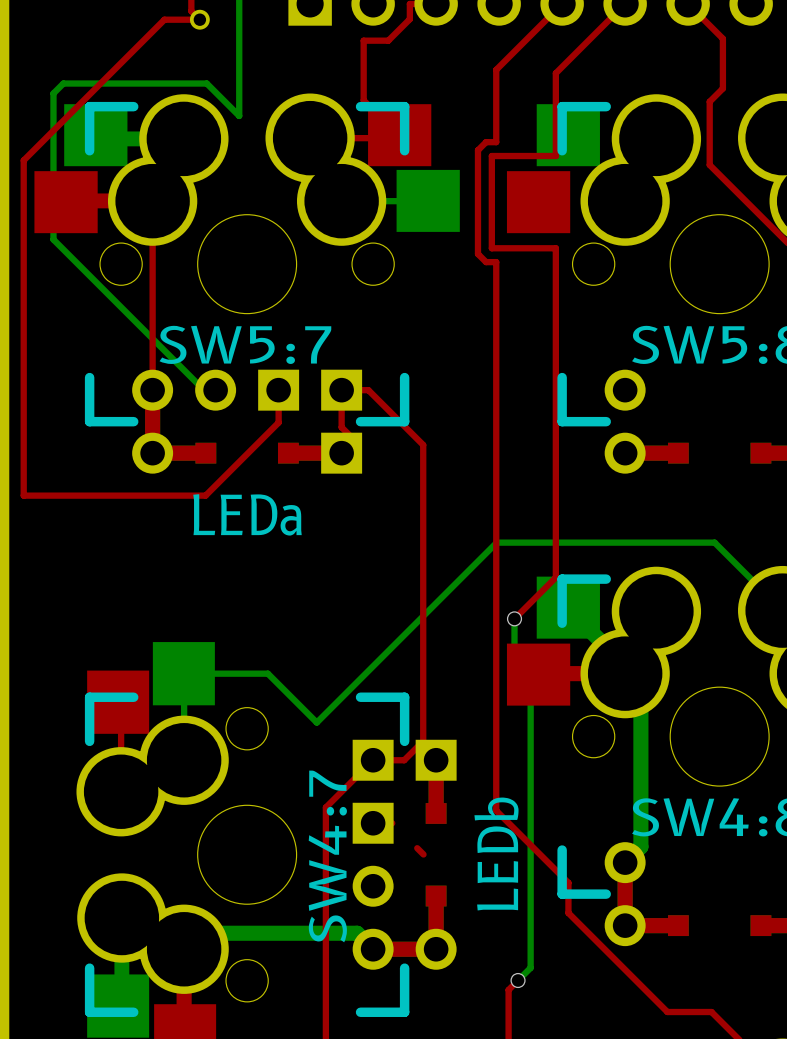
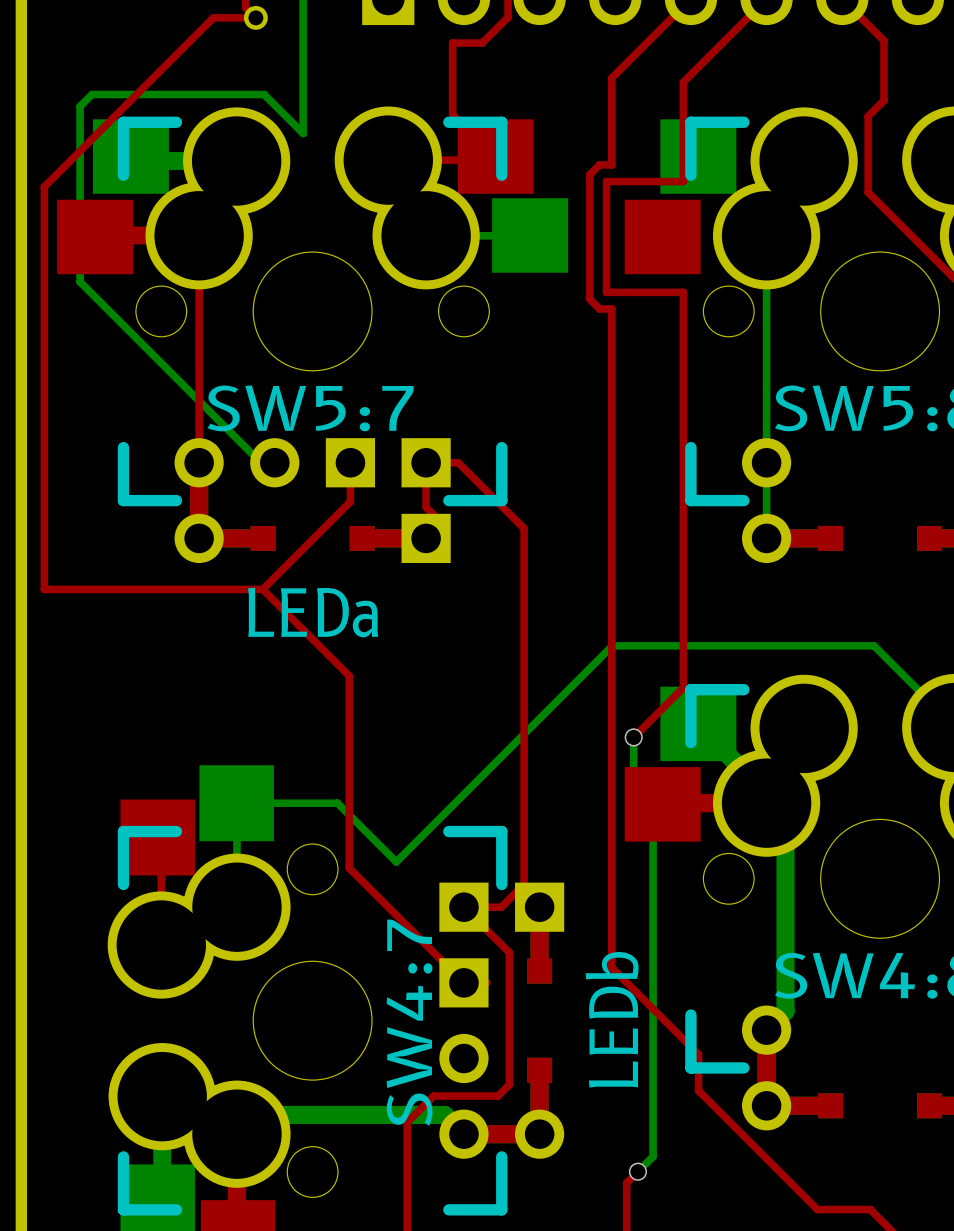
bottom track: none -> (766, 235) (766, 516)
top track: none -> (262, 589) (349, 675) (349, 868) (463, 982)
top track: (373, 760) (325, 807) (325, 939) -> (463, 907) (509, 952) (509, 1084) (498, 1096) (433, 1096) (407, 1122)
top track: (417, 848) (423, 854) -> none

